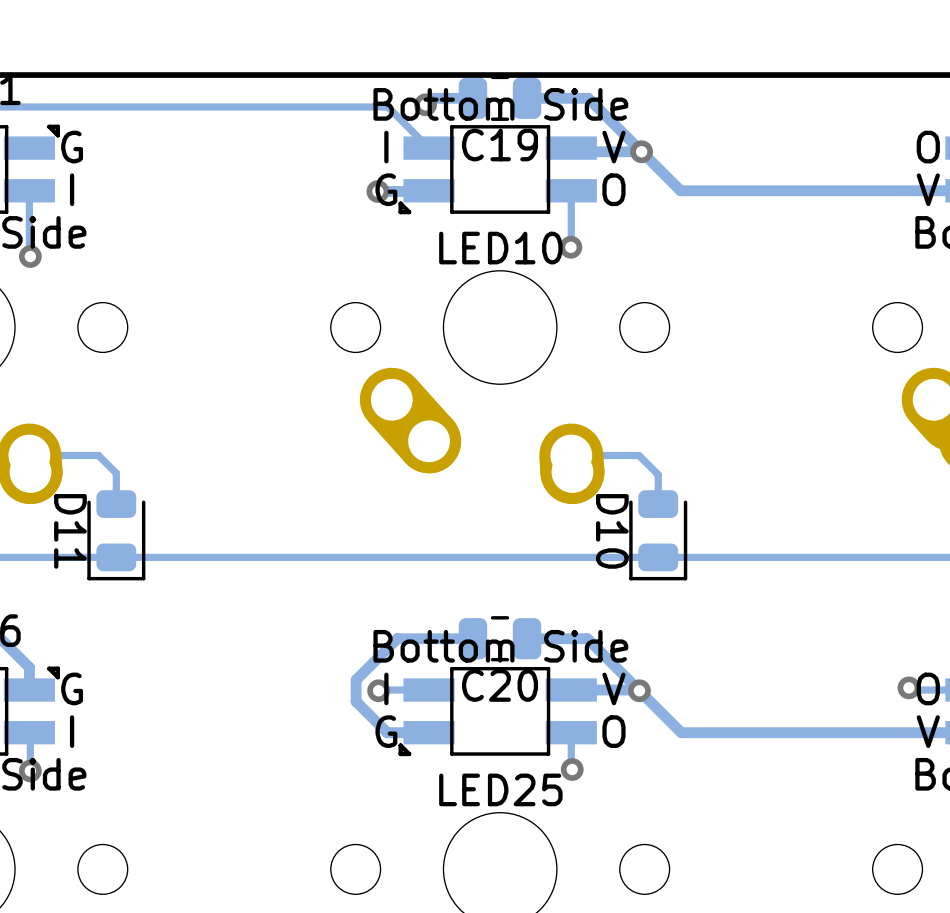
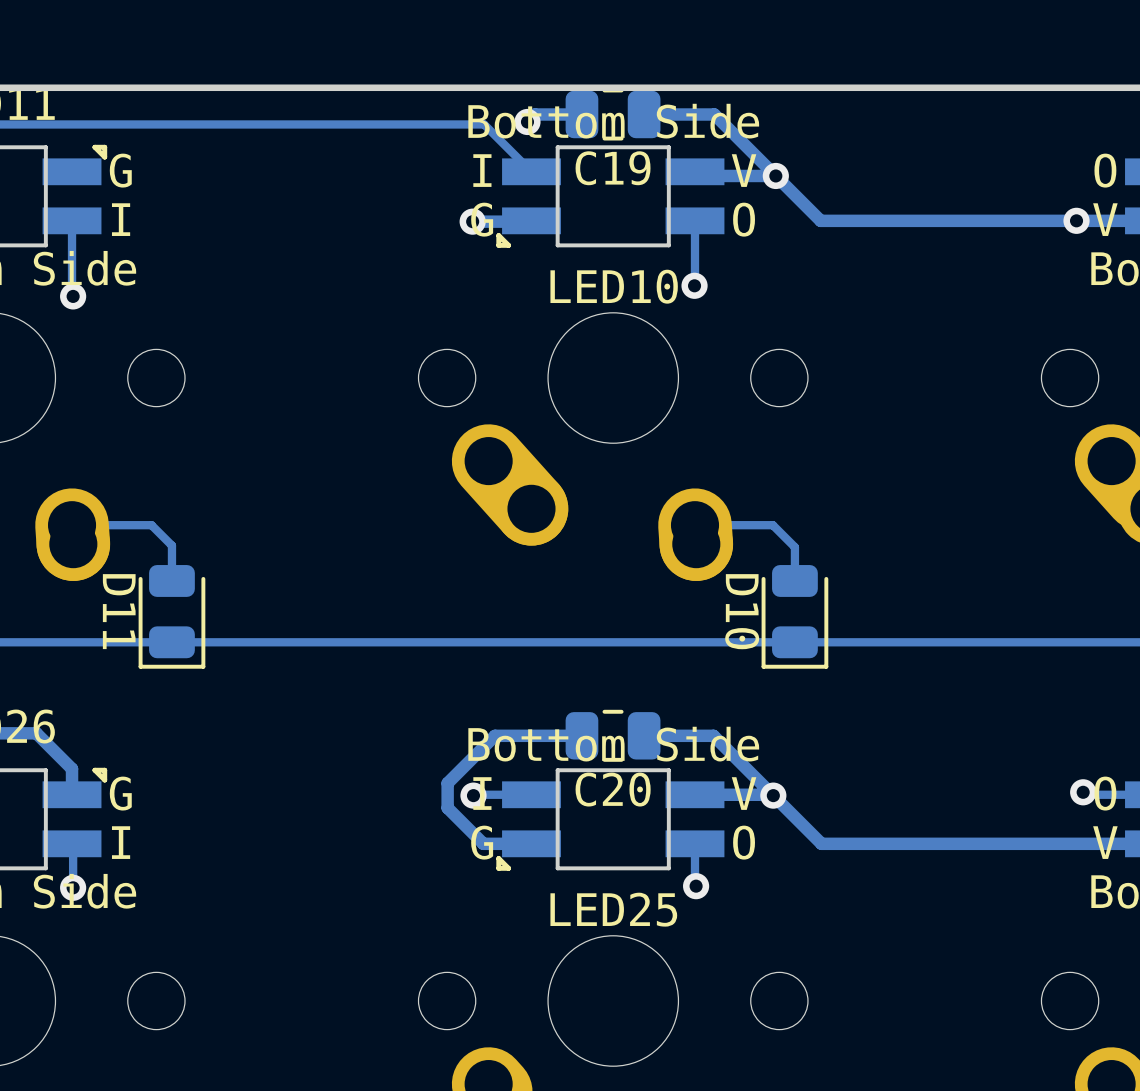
via: none -> (1076, 220)

